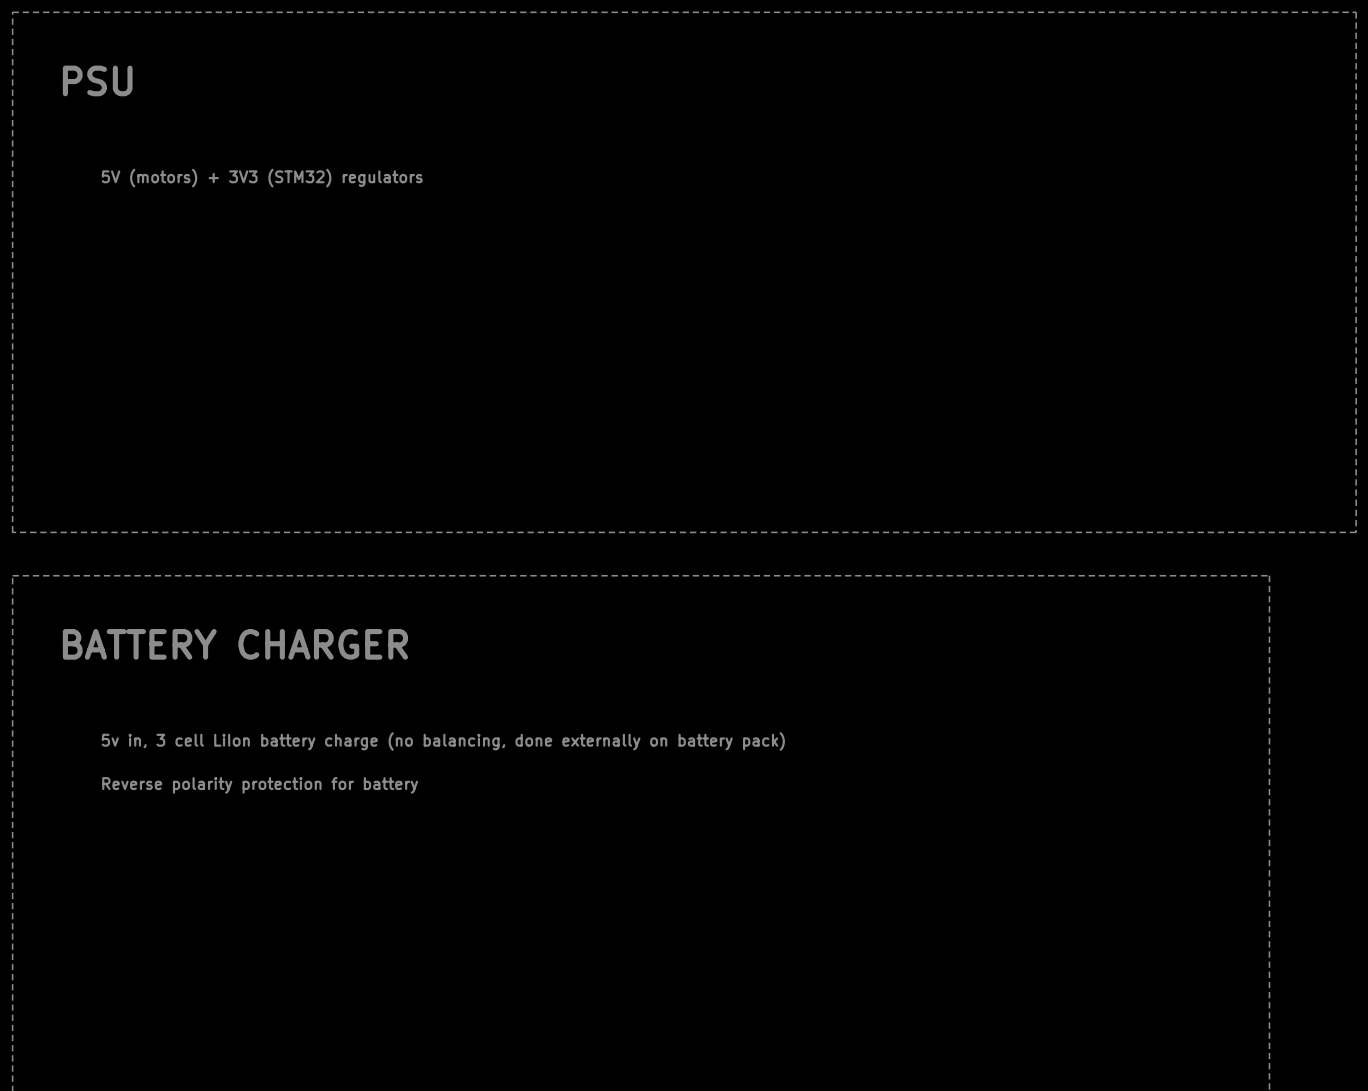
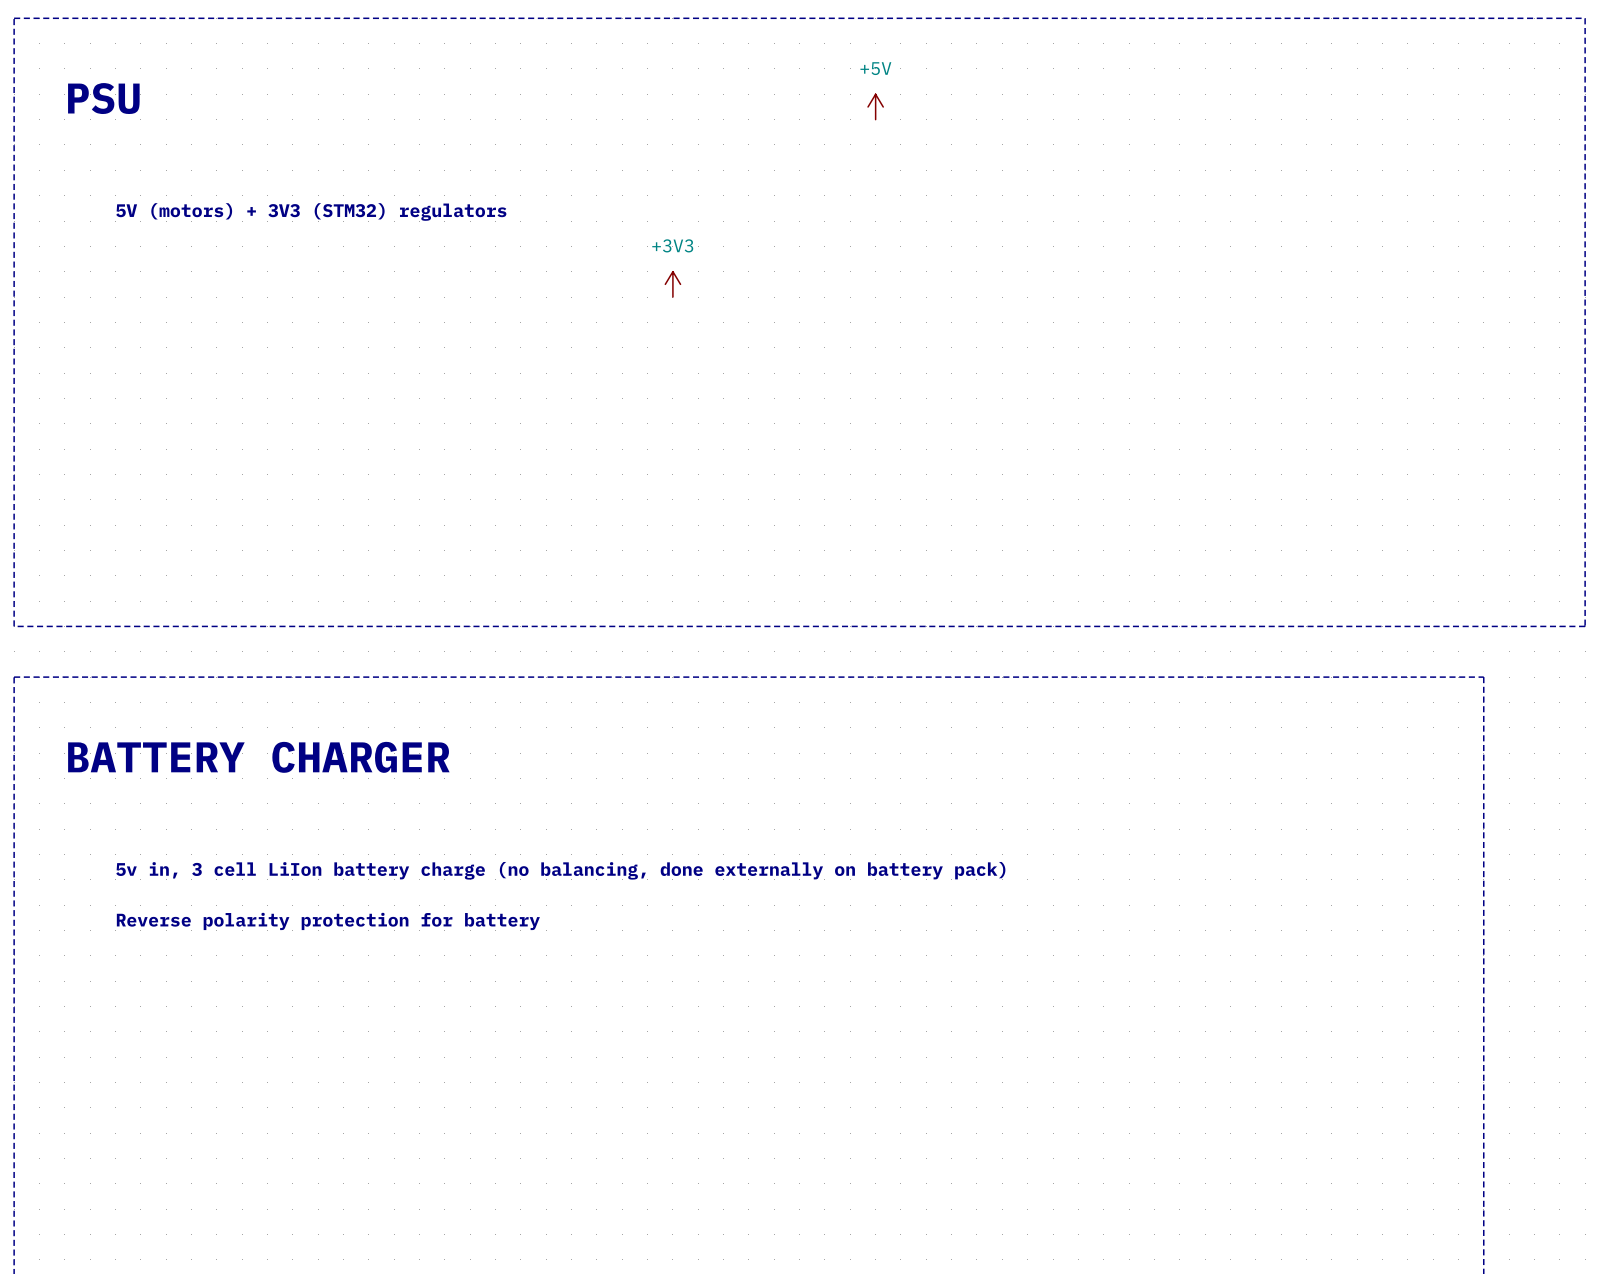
power symbol: none -> +5V (875, 106)
power symbol: none -> +3V3 (672, 284)

